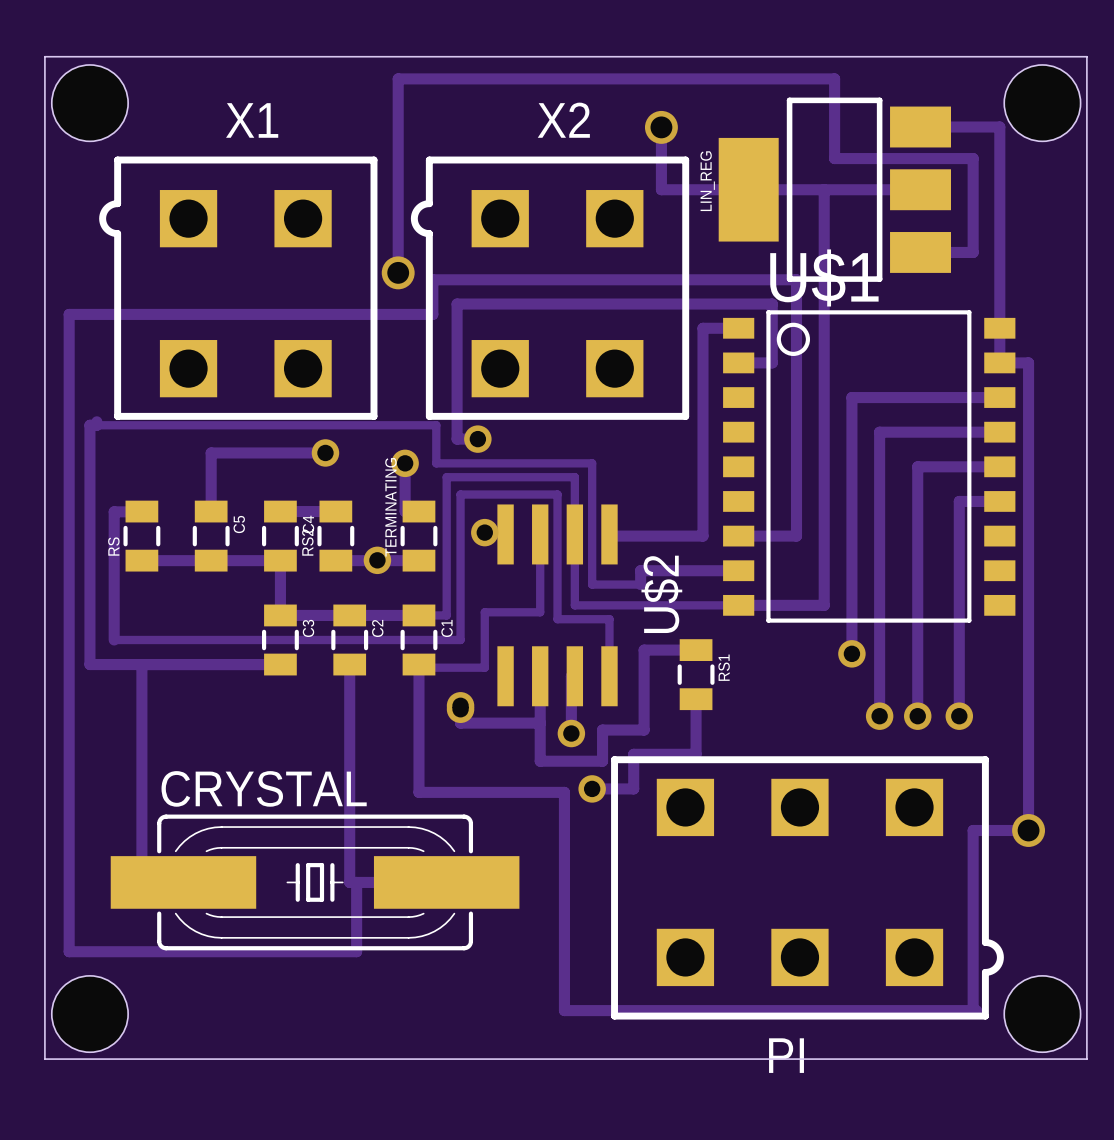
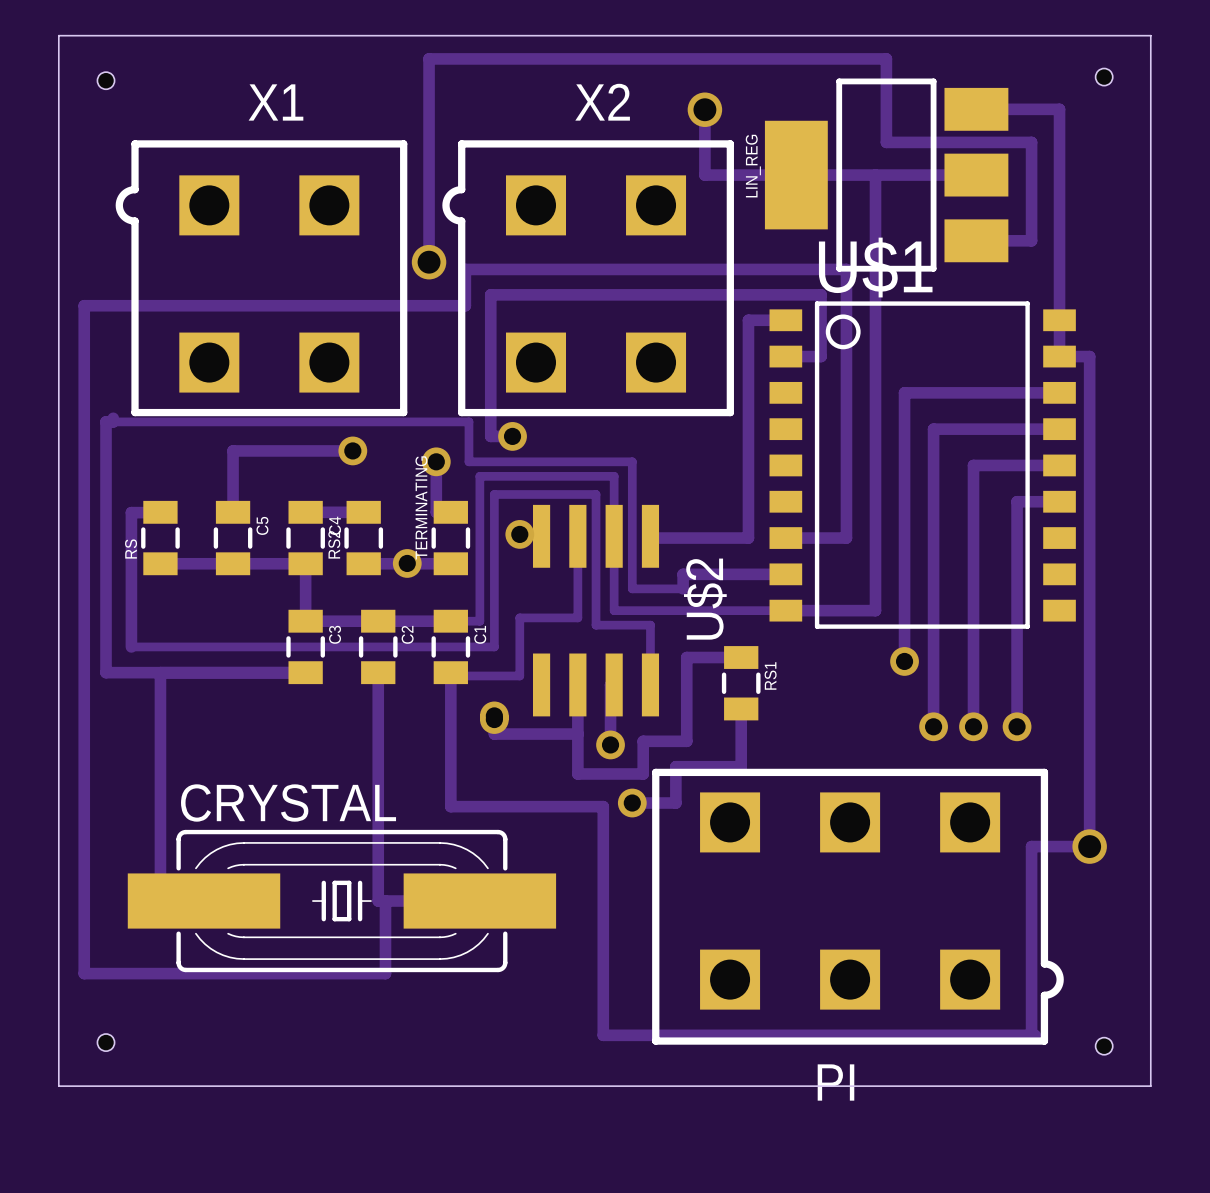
hole size: [51, 64, 129, 142] -> [97, 72, 115, 90]
hole size: [1004, 64, 1081, 142] -> [1095, 68, 1113, 86]
hole size: [51, 975, 129, 1053] -> [97, 1034, 115, 1052]
hole size: [1004, 975, 1081, 1053] -> [1095, 1037, 1113, 1055]

